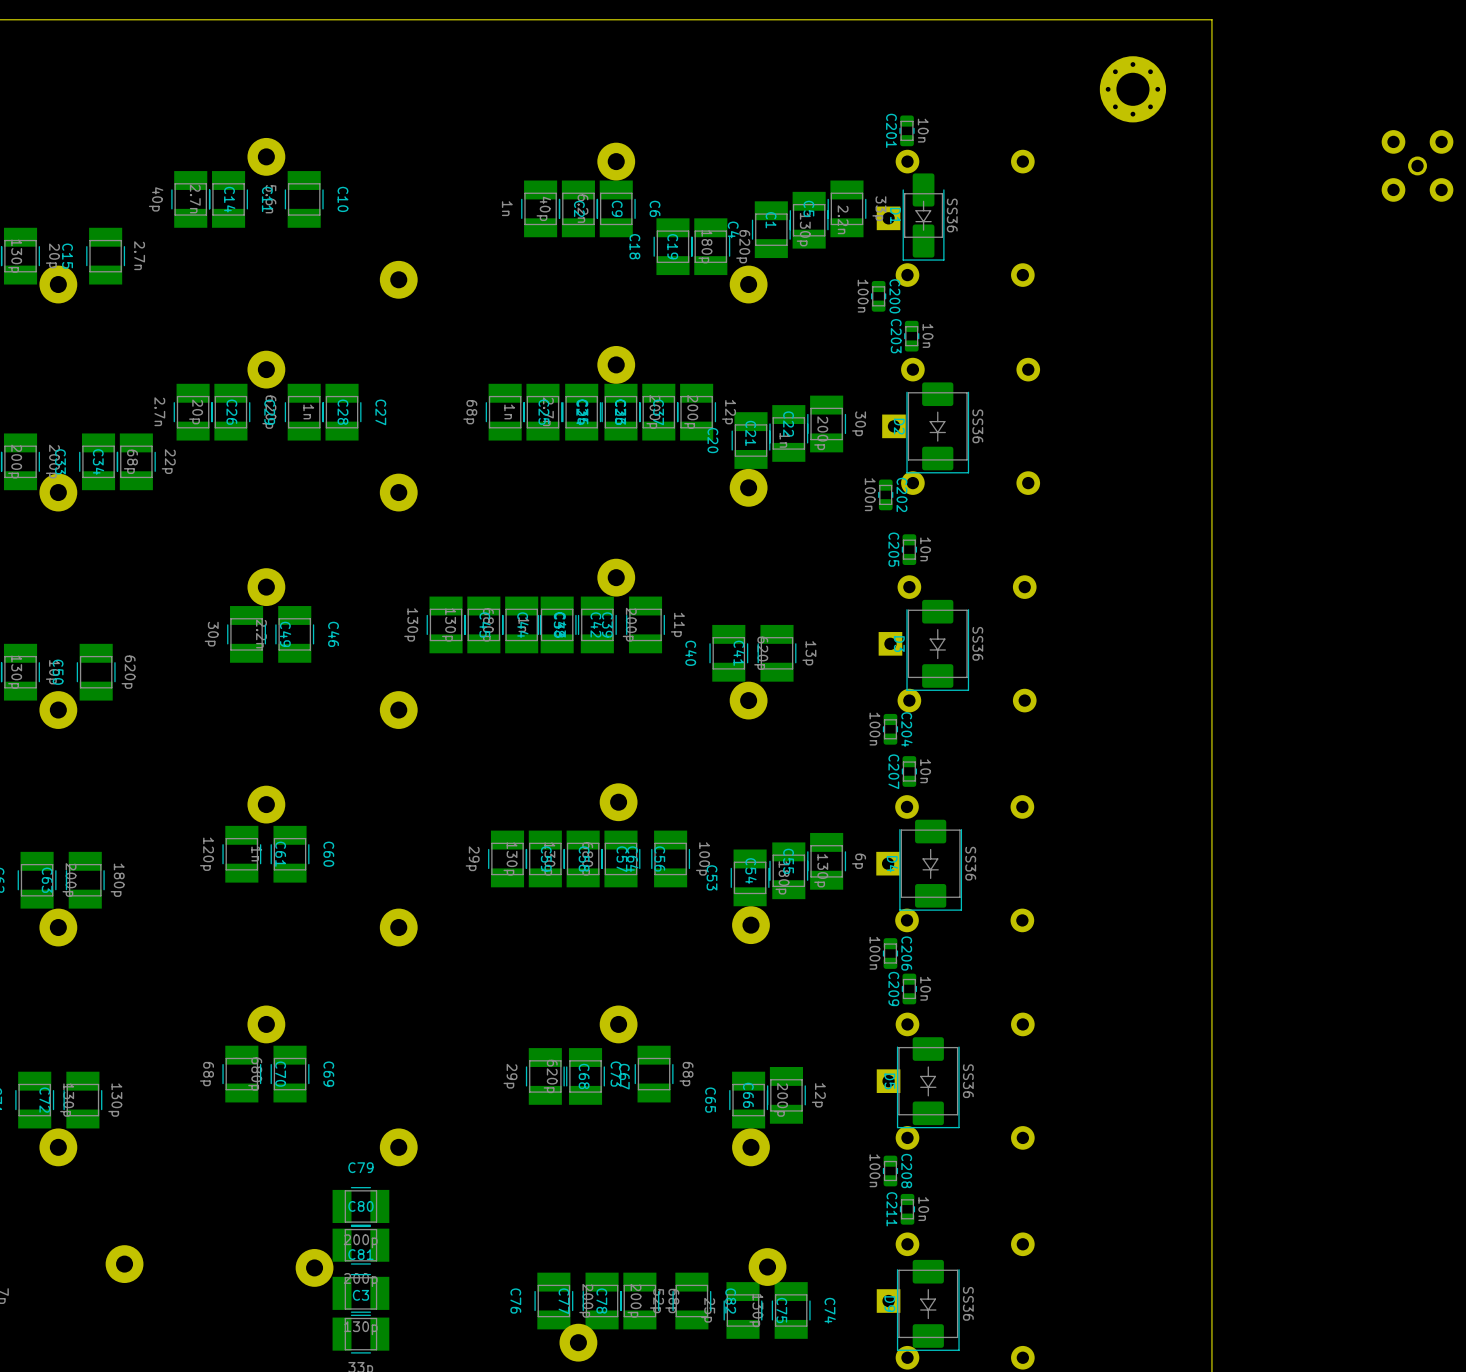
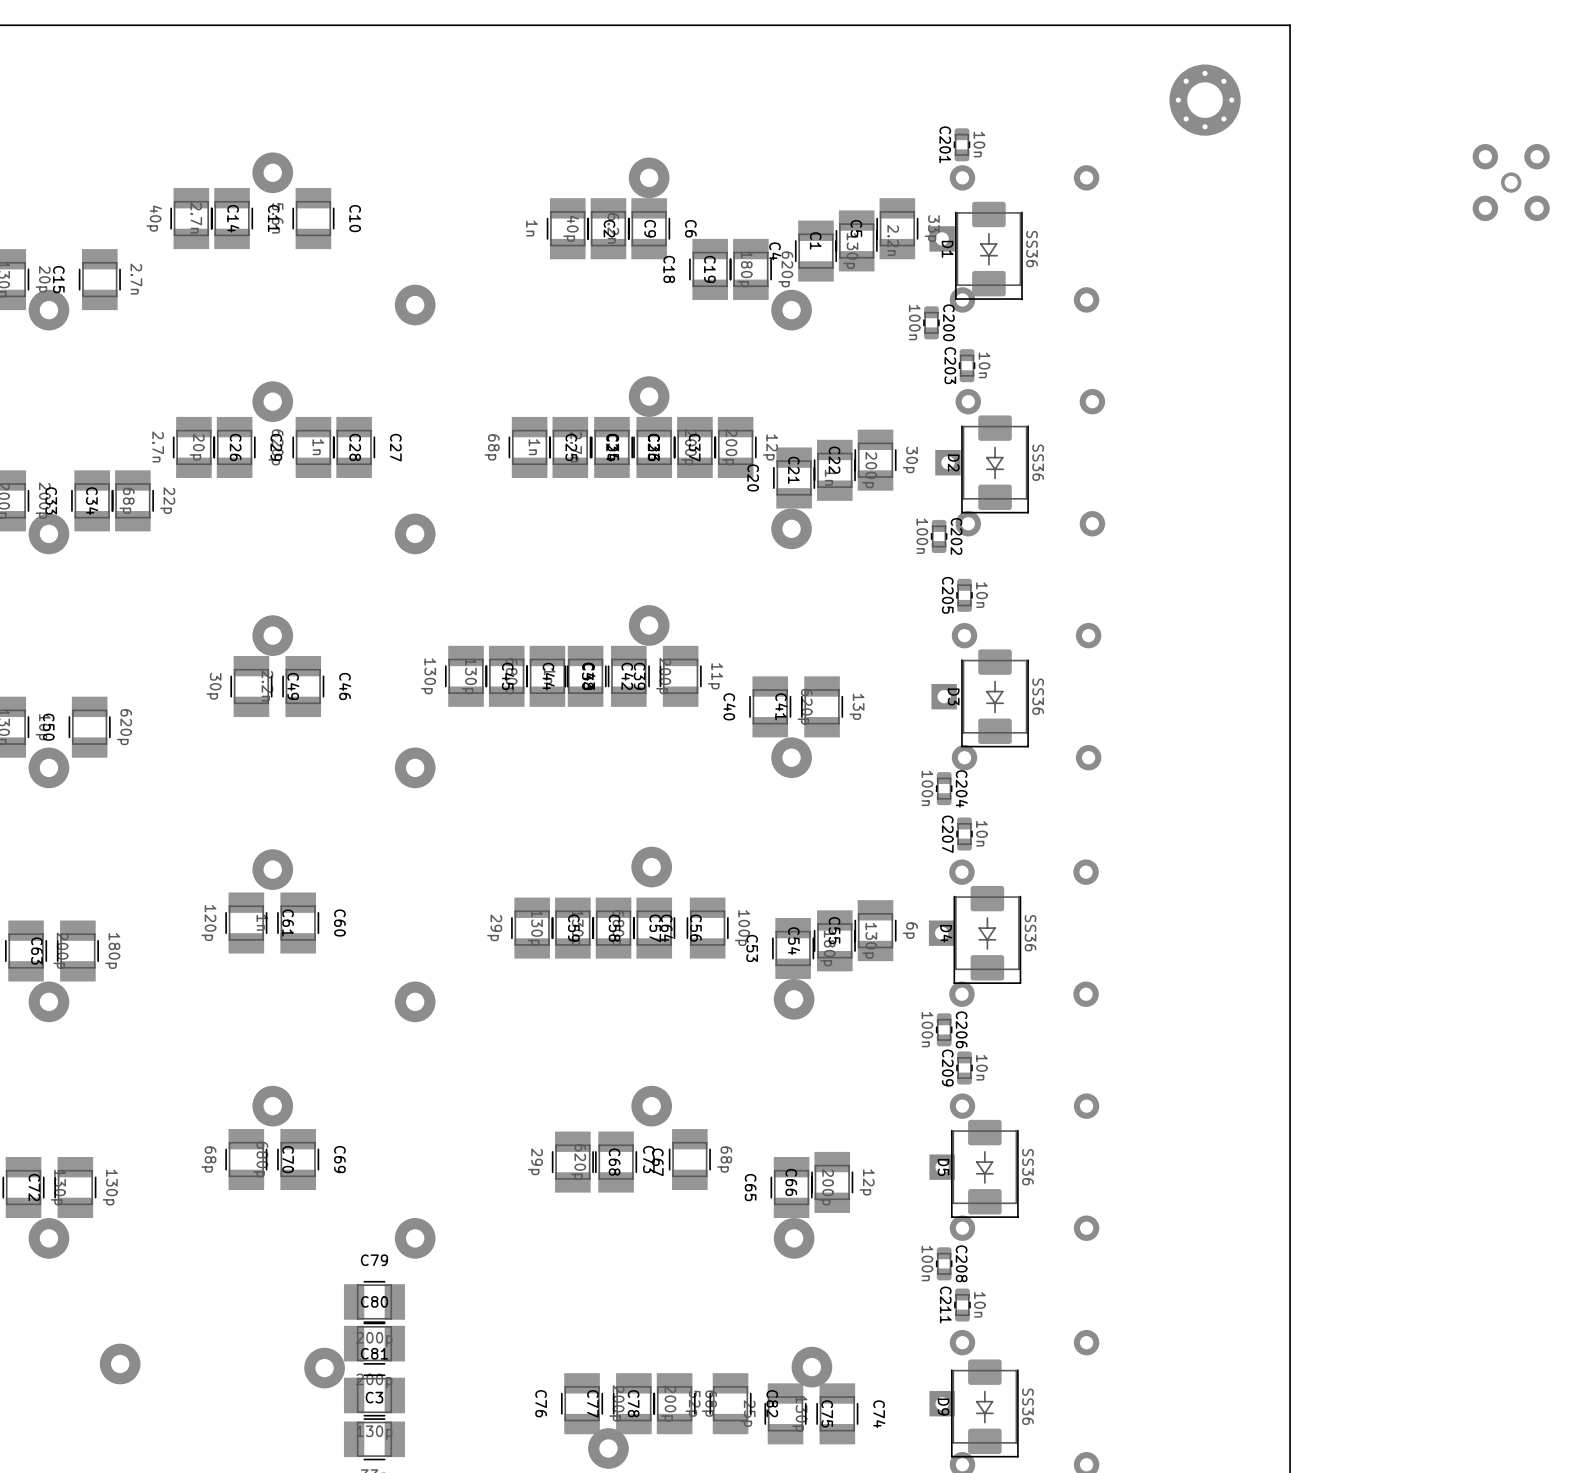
D1 footprint: [902, 173, 945, 261] -> [955, 201, 1023, 300]

